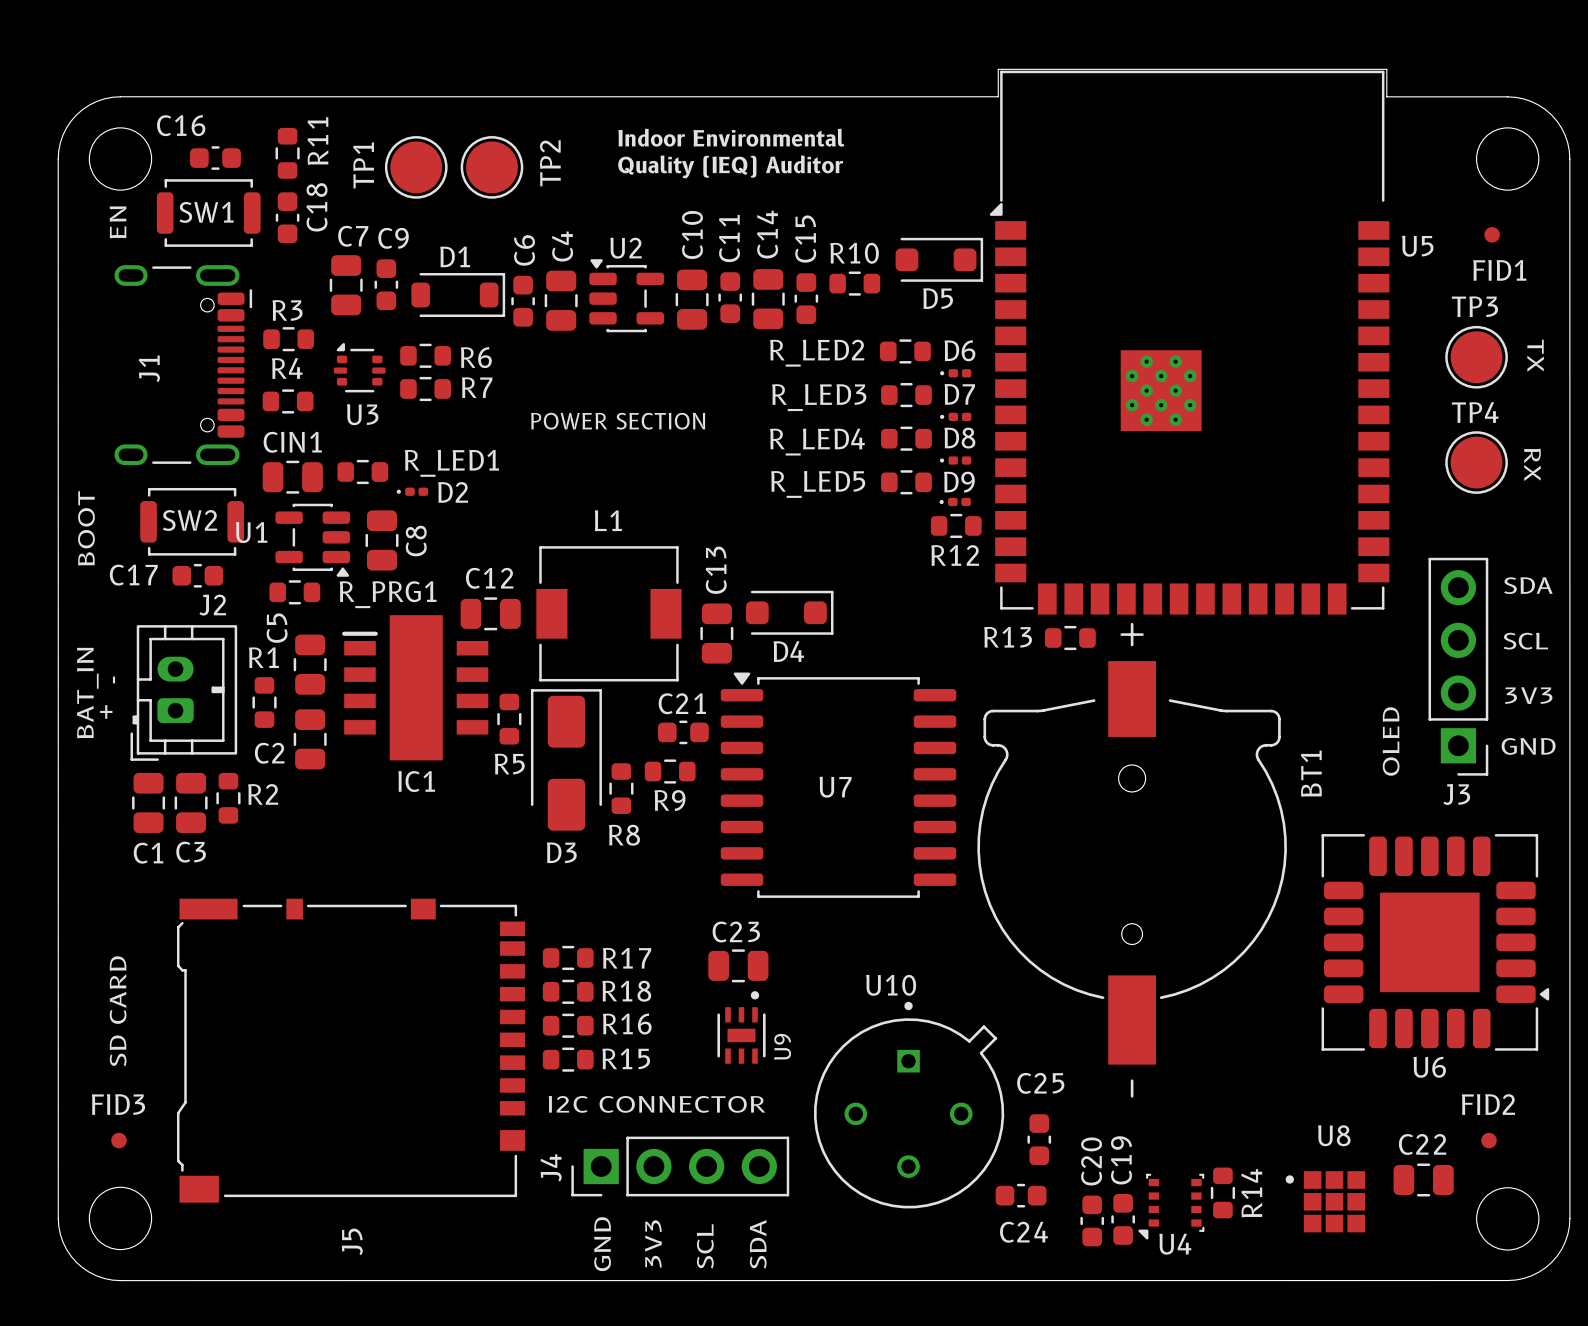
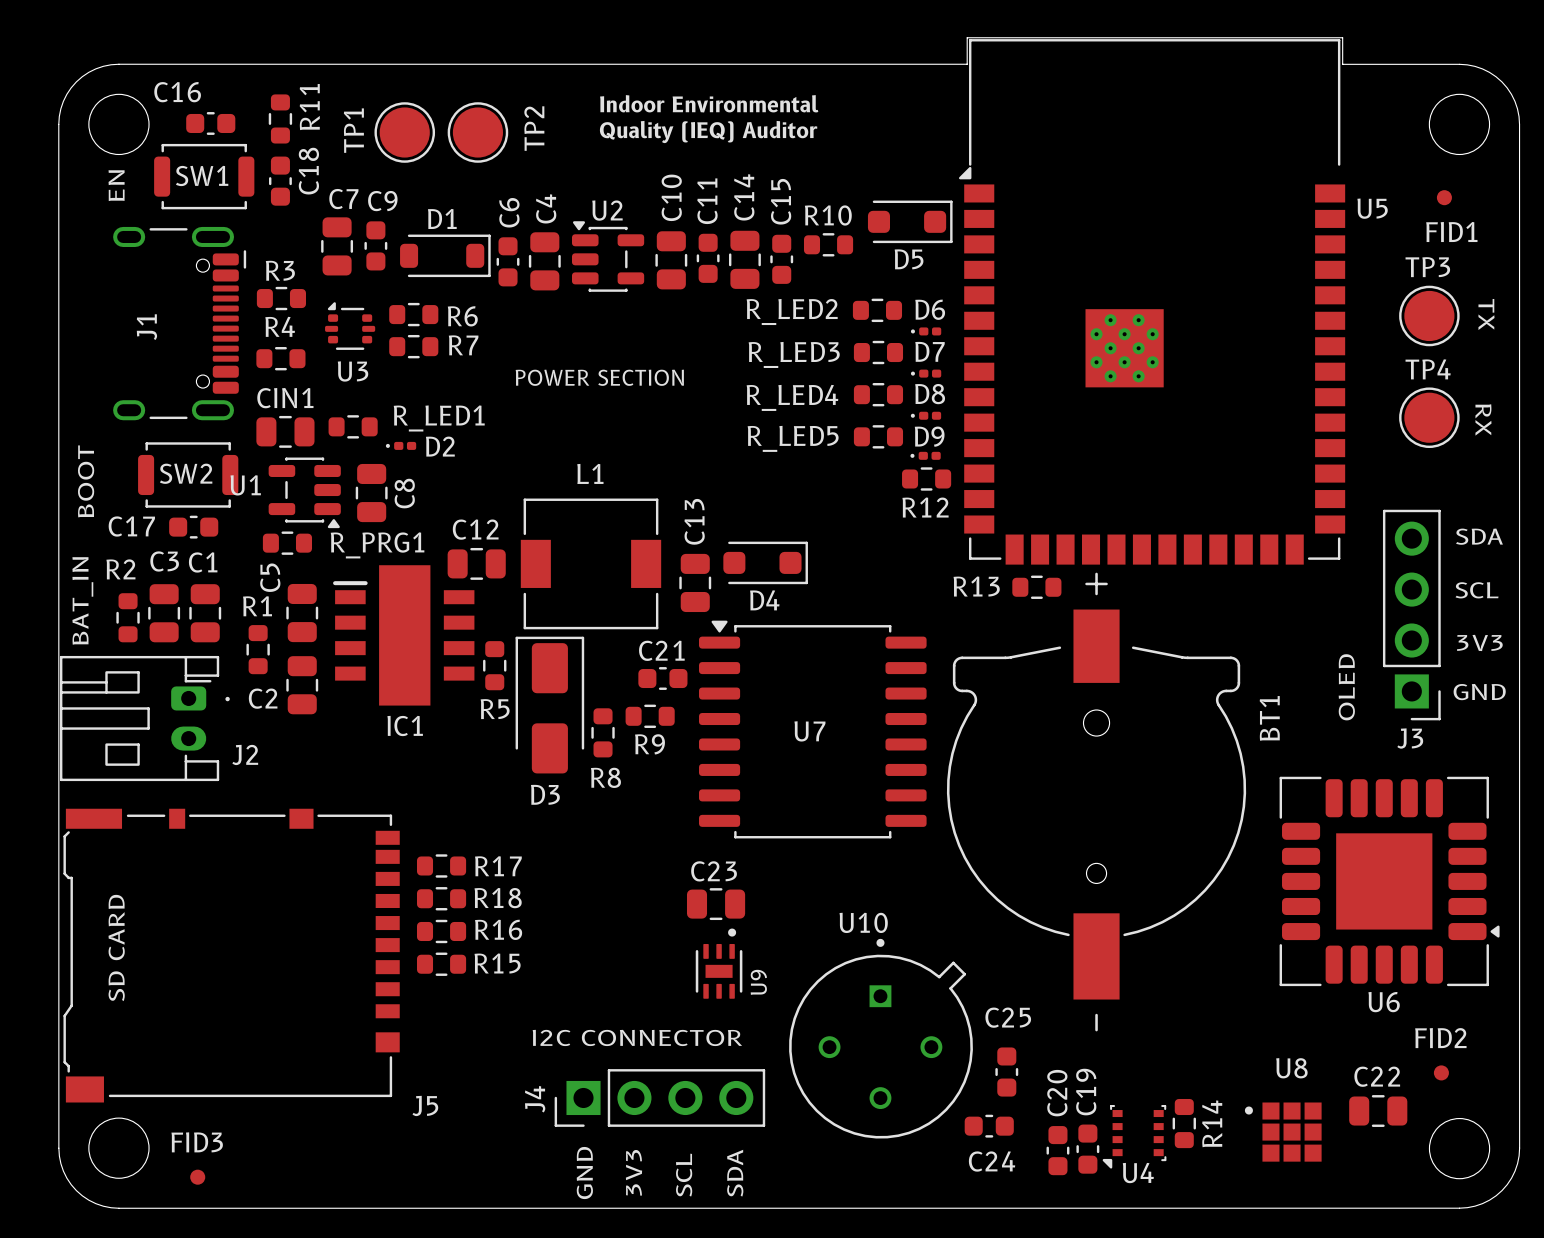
J2 name position: J2 (212, 605) -> J2 (245, 754)
J2 footprint: [130, 625, 238, 761] -> [59, 655, 220, 782]
text: - (113, 679) -> none
text position: BAT_IN (87, 693) -> BAT_IN (82, 600)
text: + (106, 711) -> none
text: none -> . (227, 699)
R2 name position: R2 (263, 794) -> R2 (120, 569)
R2 position: (228, 798) -> (128, 617)
C1 position: (148, 802) -> (205, 613)
C3 position: (191, 802) -> (164, 613)
C3 name position: C3 (191, 852) -> C3 (164, 561)
C1 name position: C1 (148, 853) -> C1 (203, 562)
R17 position: (568, 957) -> (441, 865)
R18 position: (568, 991) -> (441, 898)
R16 position: (568, 1025) -> (441, 931)
J5 position: (350, 1050) -> (231, 955)
R15 position: (568, 1059) -> (441, 964)
FID3 position: (119, 1140) -> (197, 1177)
J5 name rotation: 0° (352, 1241) -> 90° clockwise (425, 1105)
J5 name position: J5 (352, 1241) -> J5 (425, 1105)

